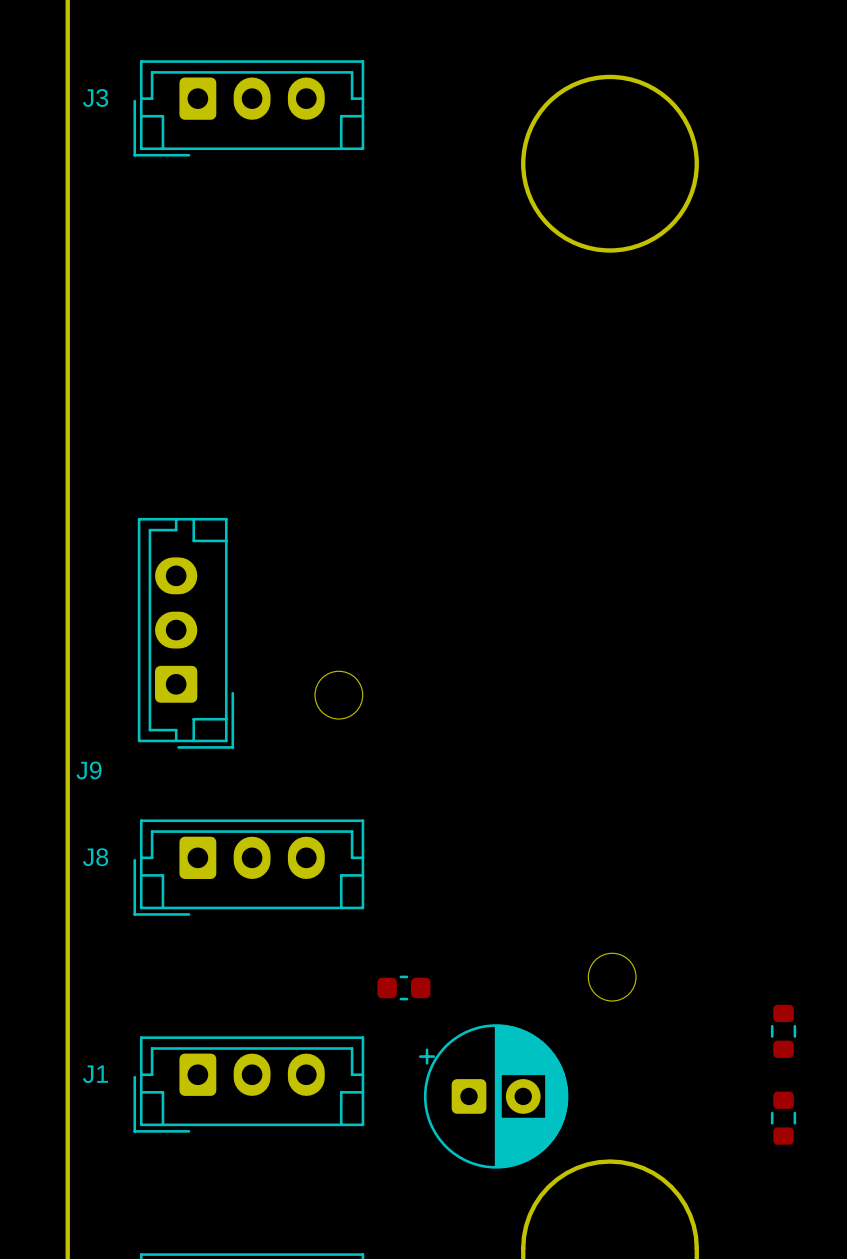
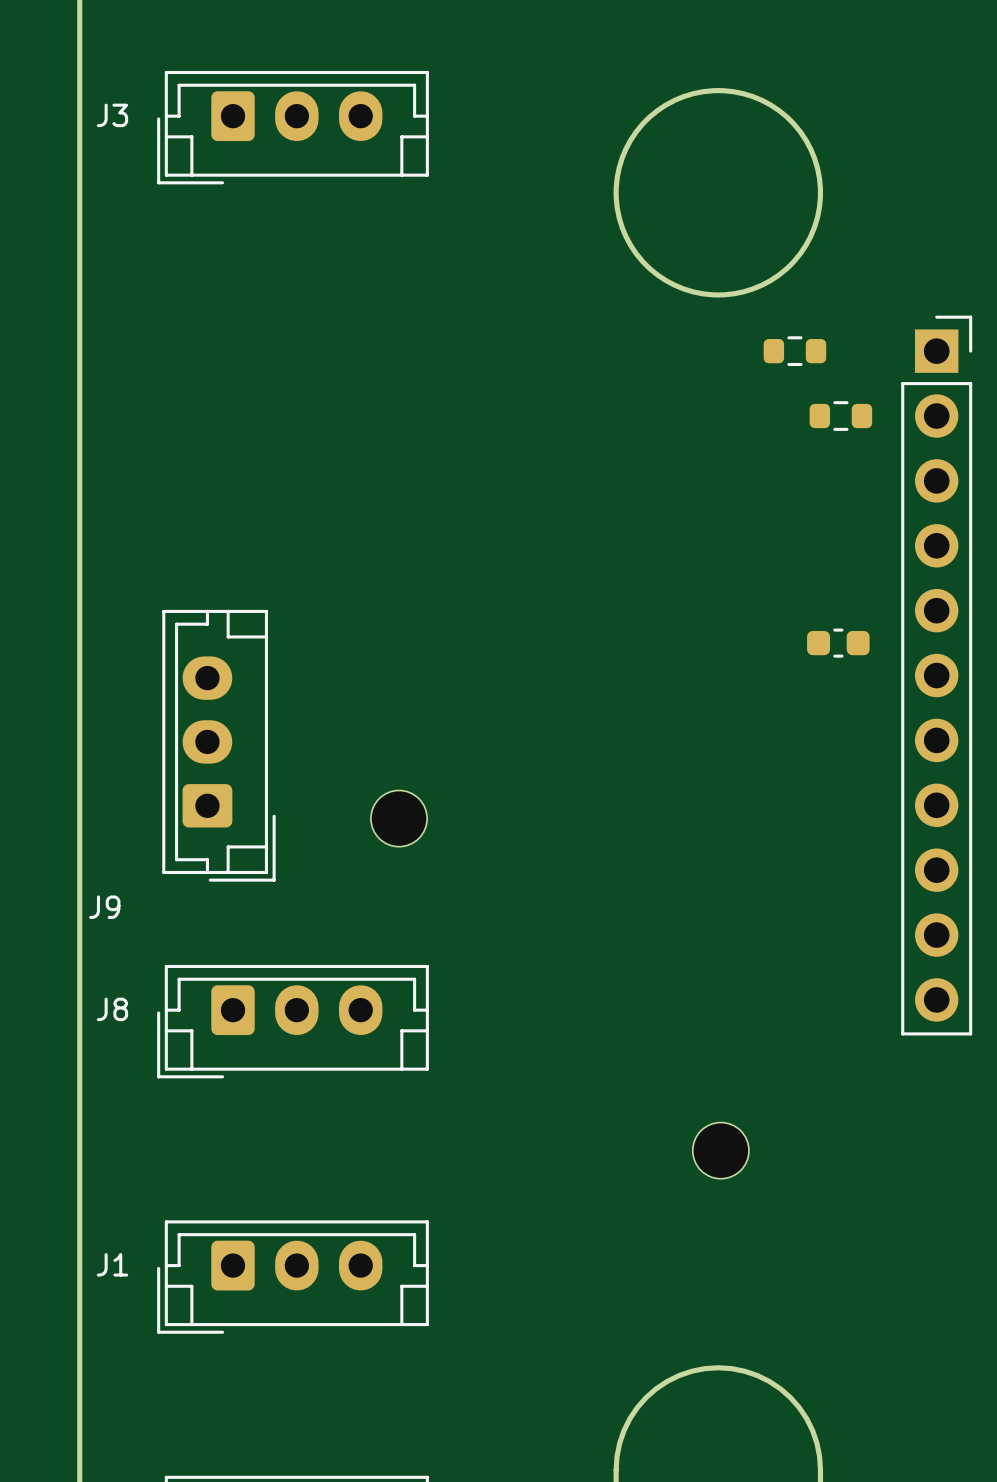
part: none -> (794, 351)
part: none -> (840, 416)
part: none -> (936, 675)
part position: (403, 987) -> (838, 643)
part: (783, 1031) -> none
part: (493, 1096) -> none
part: (783, 1118) -> none

